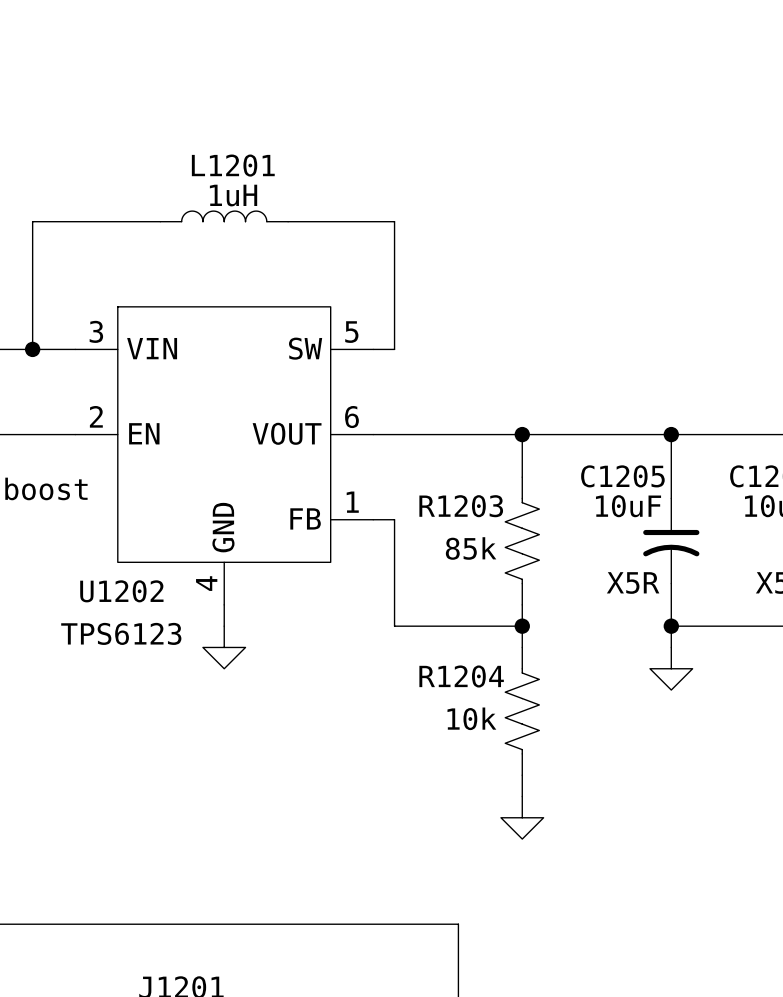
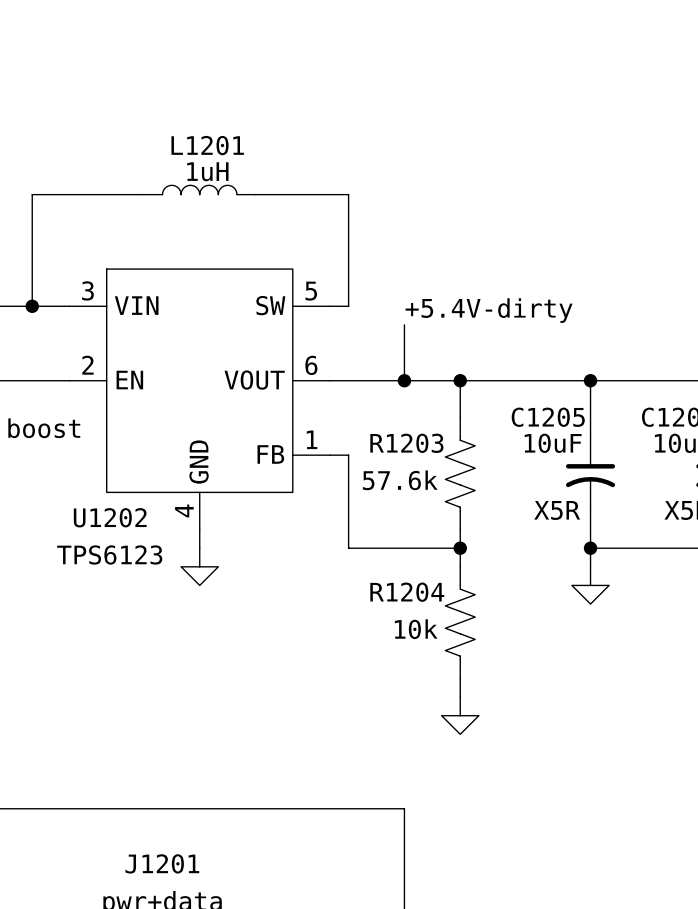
label: none -> +5.4V-dirty (489, 310)
wire: none -> (404, 324) (404, 380)
junction: none -> (404, 380)
R1203 value: 85k (471, 548) -> 57.6k (400, 480)

